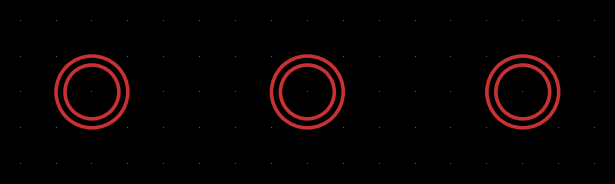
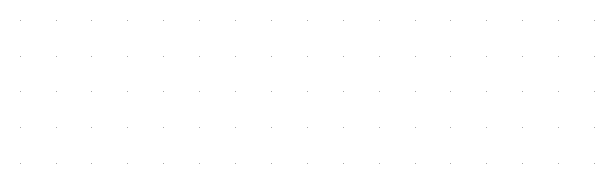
part: (91, 91) -> none
part: (307, 91) -> none
part: (522, 91) -> none

